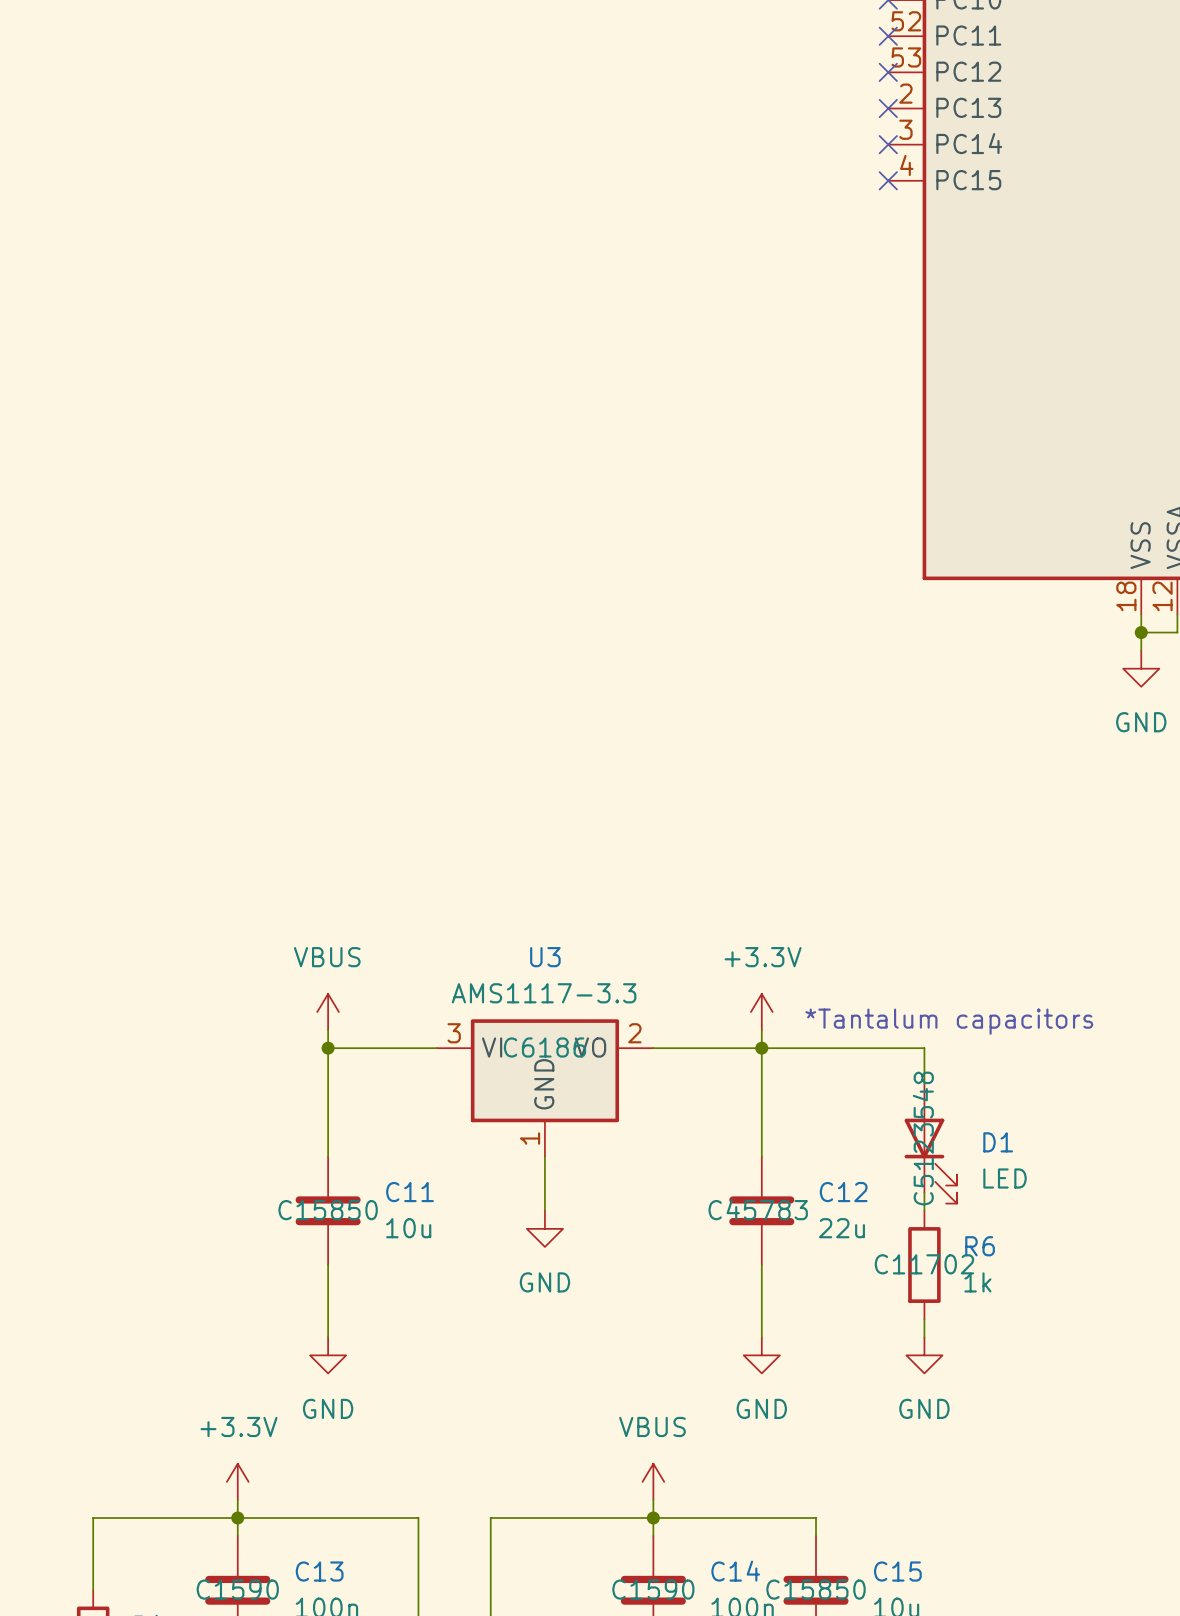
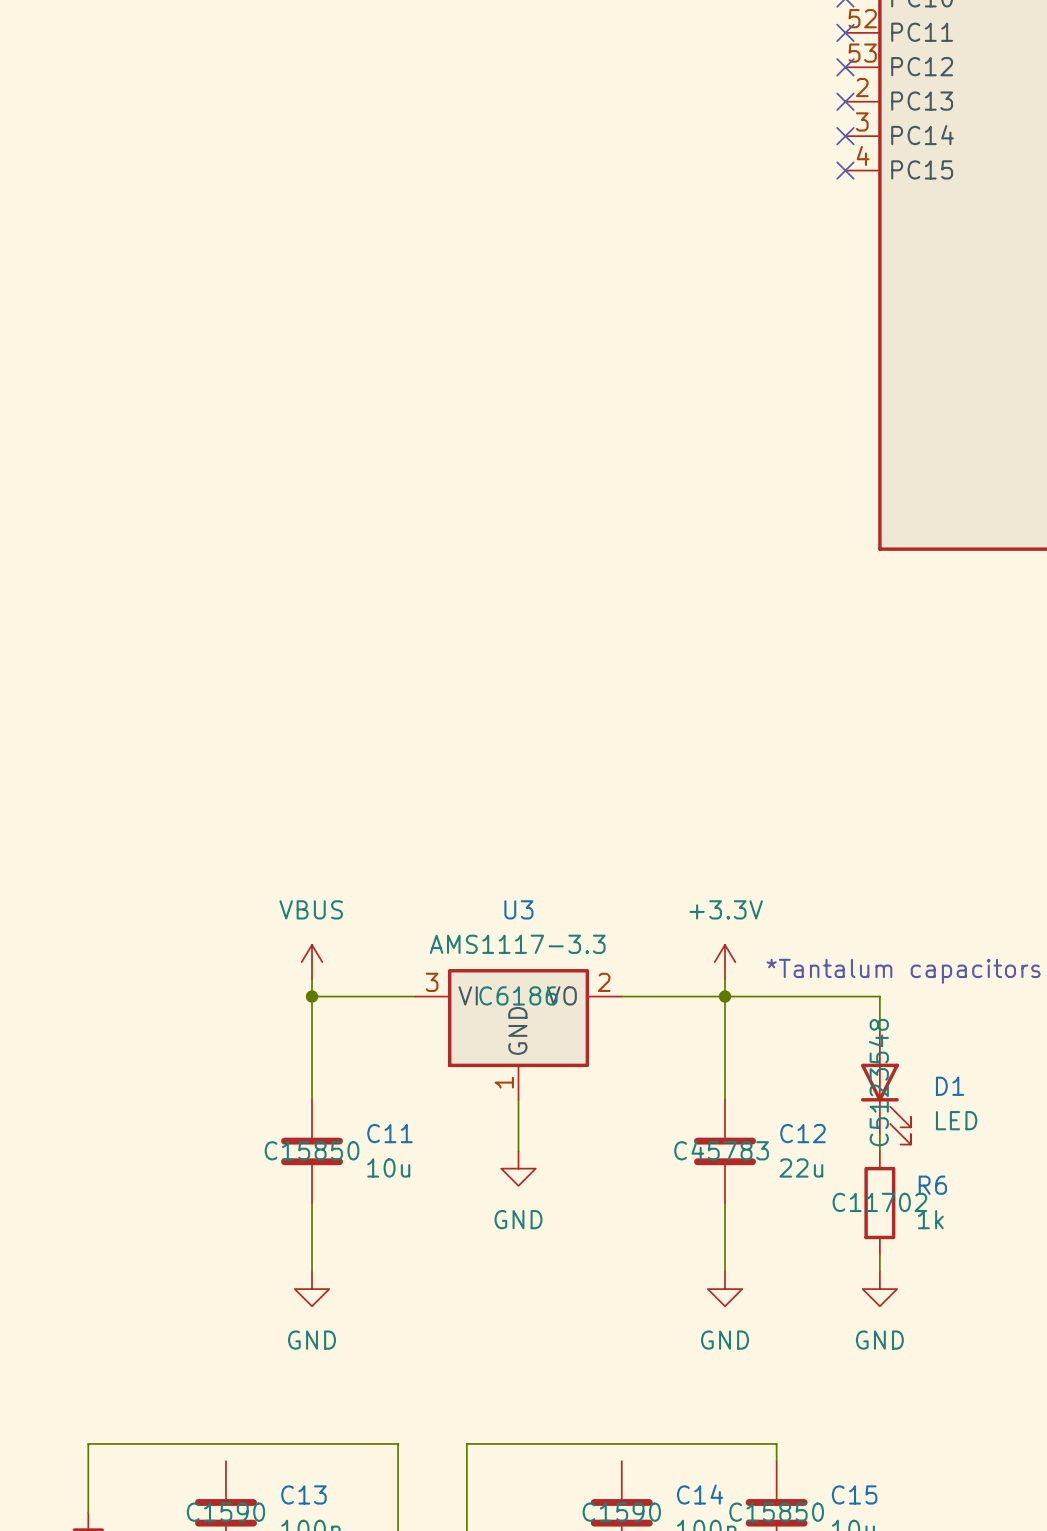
power symbol: +3.3V (237, 1481) -> none
power symbol: VBUS (653, 1481) -> none
wire: (237, 1499) (237, 1536) -> none
wire: (653, 1499) (653, 1536) -> none
junction: (237, 1517) -> none
junction: (653, 1517) -> none

